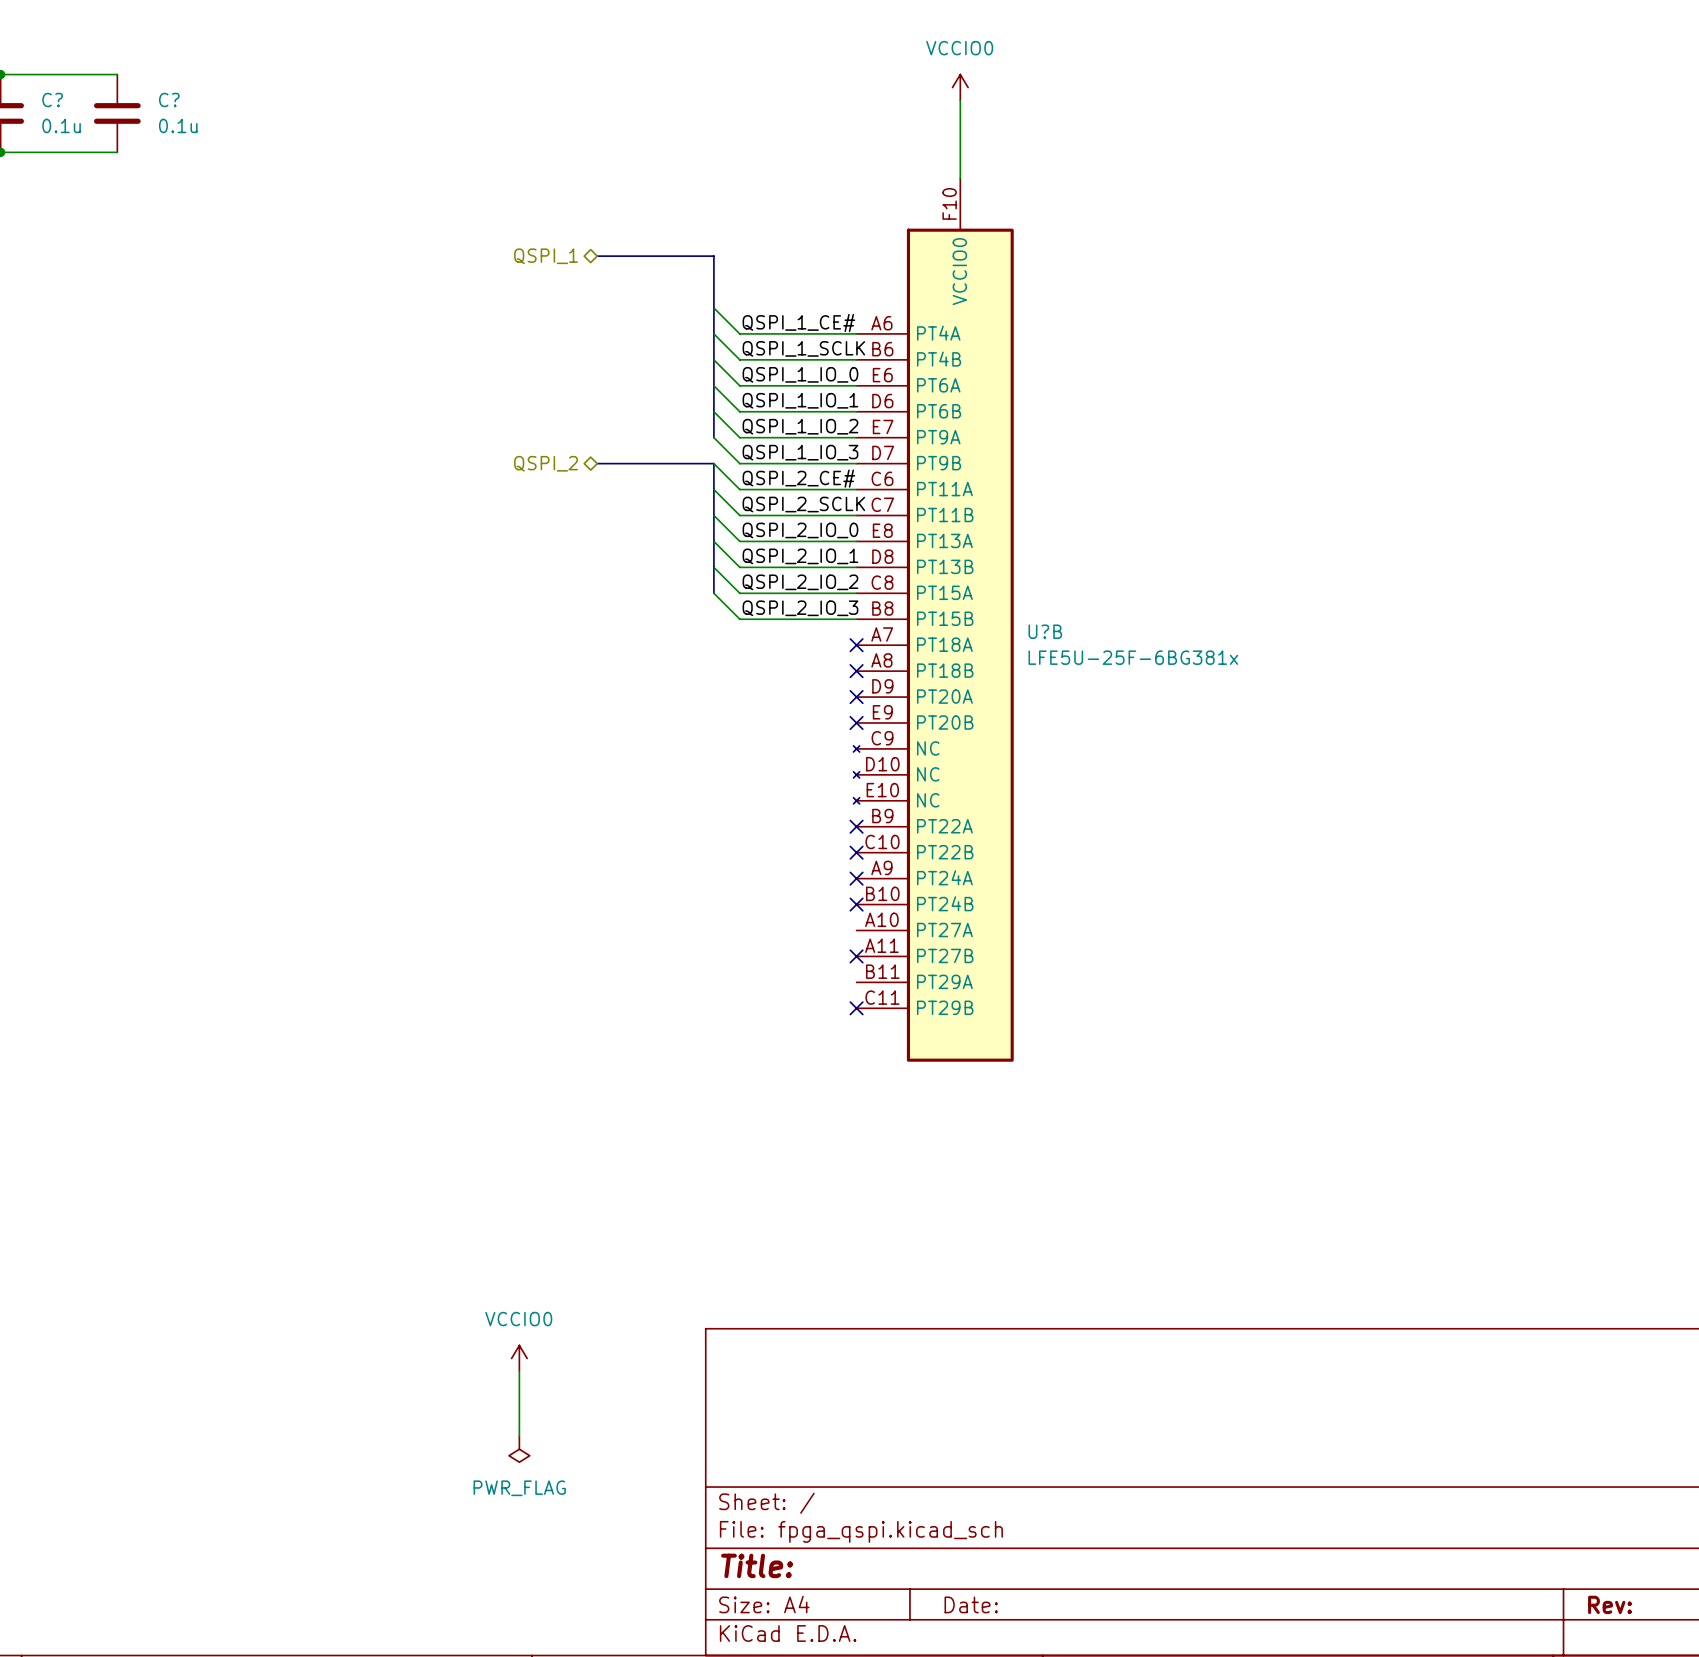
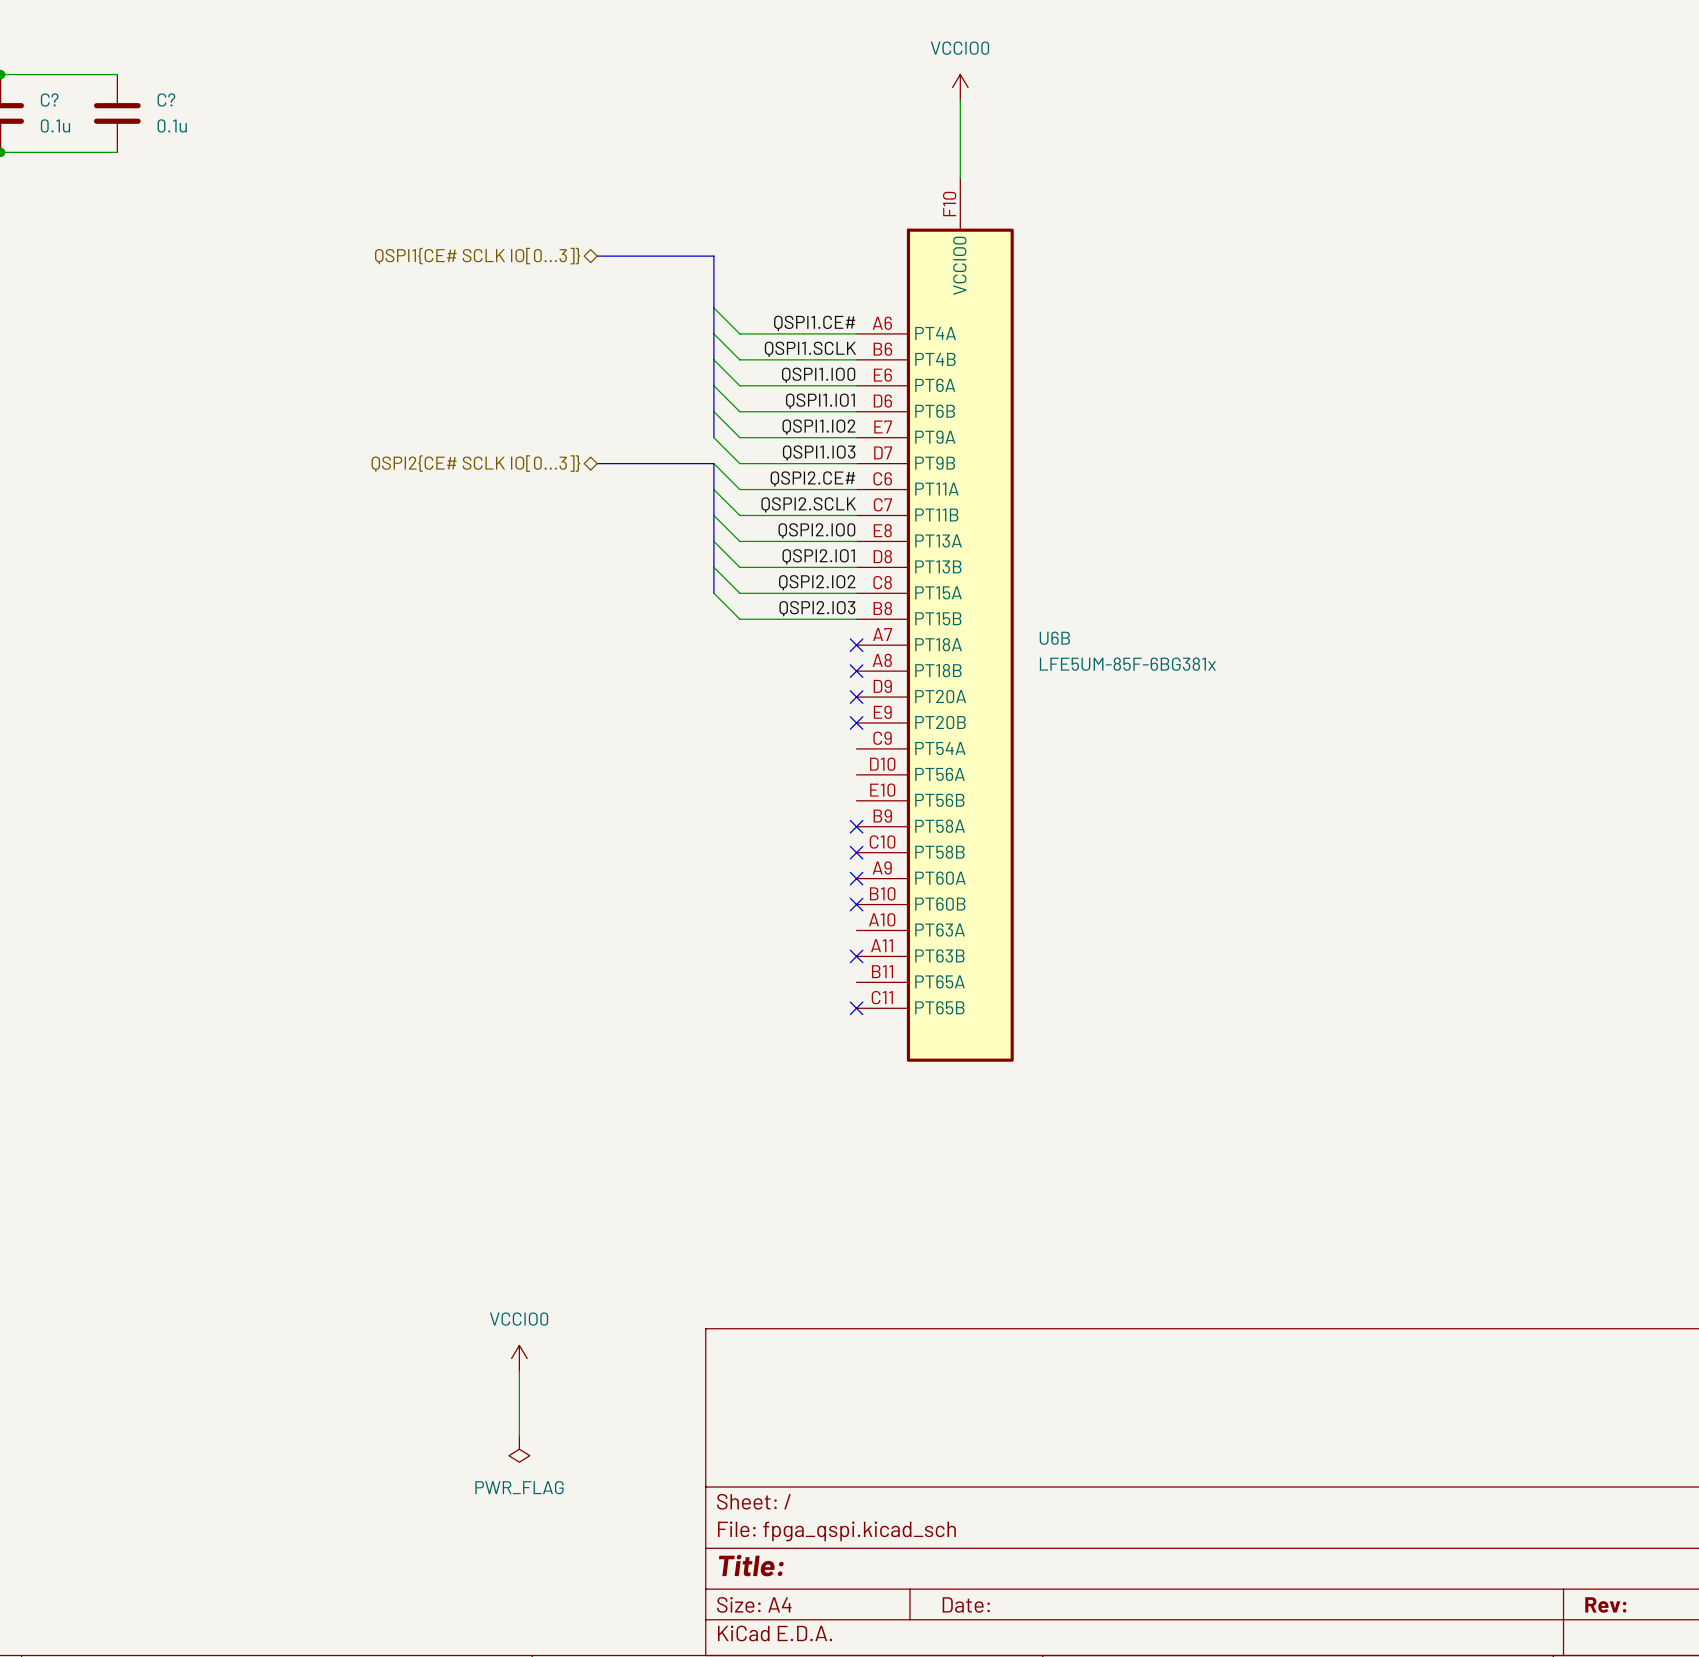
hierarchical label: QSPI_1 (546, 256) -> QSPI1{CE# SCLK IO[0...3]} (477, 256)
label: QSPI_1_CE# (798, 322) -> QSPI1.CE# (814, 323)
label: QSPI_1_SCLK (803, 348) -> QSPI1.SCLK (810, 349)
label: QSPI_1_IO_0 (800, 374) -> none
label: none -> QSPI1.IO0 (818, 375)
label: QSPI_1_IO_1 (800, 400) -> none
label: none -> QSPI1.IO1 (820, 401)
label: QSPI_1_IO_2 (800, 426) -> none
label: none -> QSPI1.IO2 (818, 427)
label: QSPI_1_IO_3 (800, 452) -> none
label: none -> QSPI1.IO3 (819, 453)
hierarchical label: QSPI_2 (546, 463) -> QSPI2{CE# SCLK IO[0...3]} (475, 463)
label: QSPI_2_CE# (798, 478) -> QSPI2.CE# (812, 478)
label: QSPI_2_SCLK (803, 504) -> QSPI2.SCLK (808, 504)
label: QSPI_2_IO_0 (800, 530) -> none
label: none -> QSPI2.IO0 (816, 530)
label: QSPI_2_IO_1 (800, 556) -> none
label: none -> QSPI2.IO1 (818, 556)
label: QSPI_2_IO_2 (800, 582) -> none
label: none -> QSPI2.IO2 (817, 582)
label: QSPI_2_IO_3 (800, 608) -> none
label: none -> QSPI2.IO3 (817, 608)
U?B: LFE5U-25F-6BG381x (933, 620) -> none
U6B: none -> LFE5UM-85F-6BG381x (935, 620)

